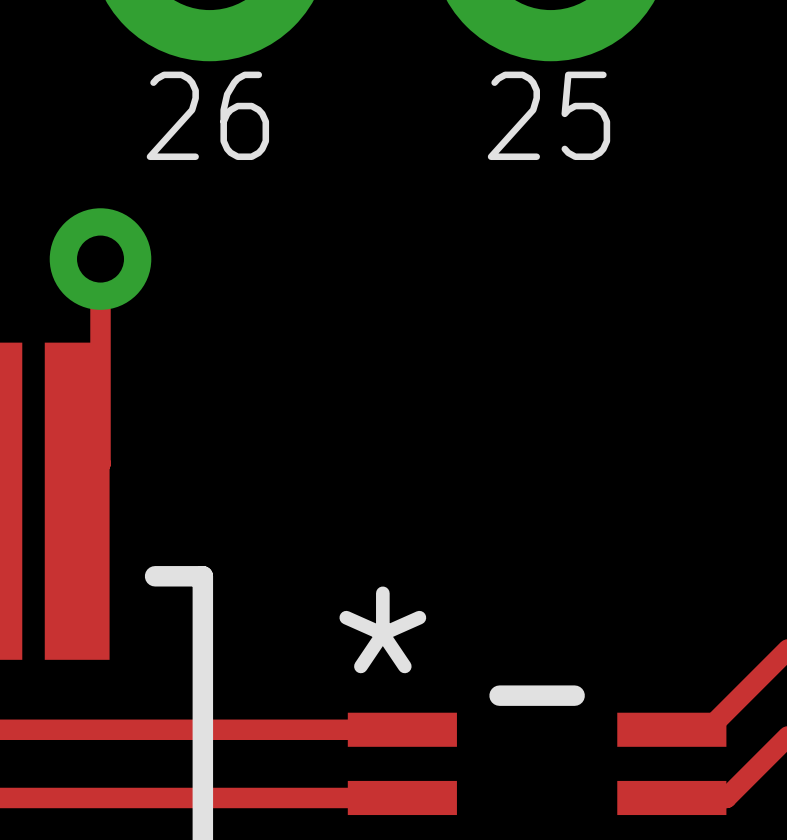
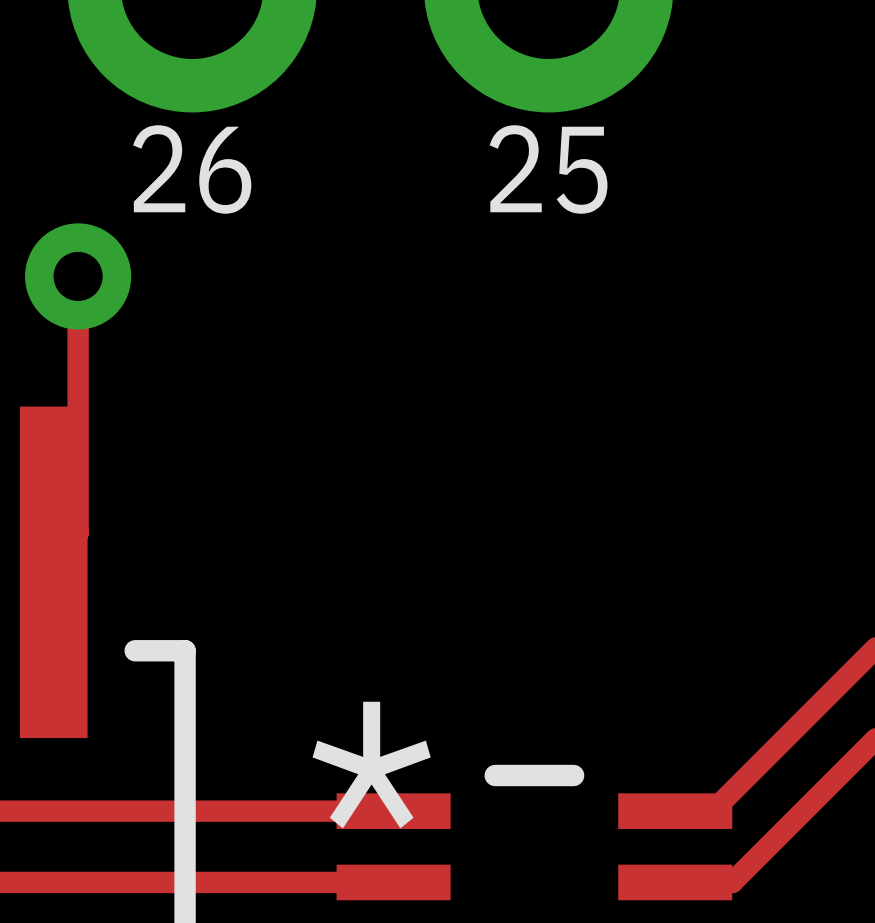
via position: (100, 259) -> (78, 276)

